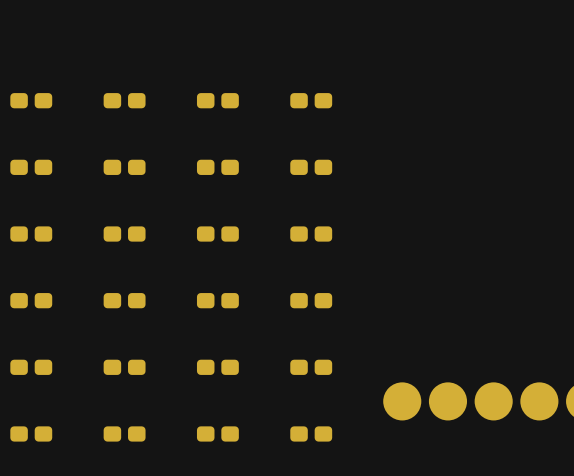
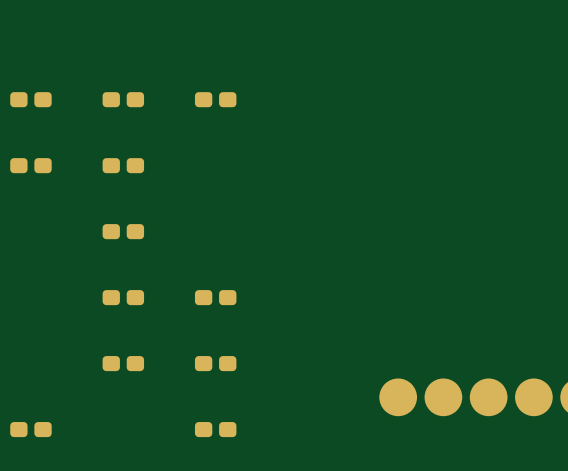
part: (311, 100) -> none
part: (217, 167) -> none
part: (311, 167) -> none
part: (31, 234) -> none
part: (217, 234) -> none
part: (311, 234) -> none
part: (31, 300) -> none
part: (311, 300) -> none
part: (31, 367) -> none
part: (311, 367) -> none
part: (124, 433) -> none
part: (311, 433) -> none

